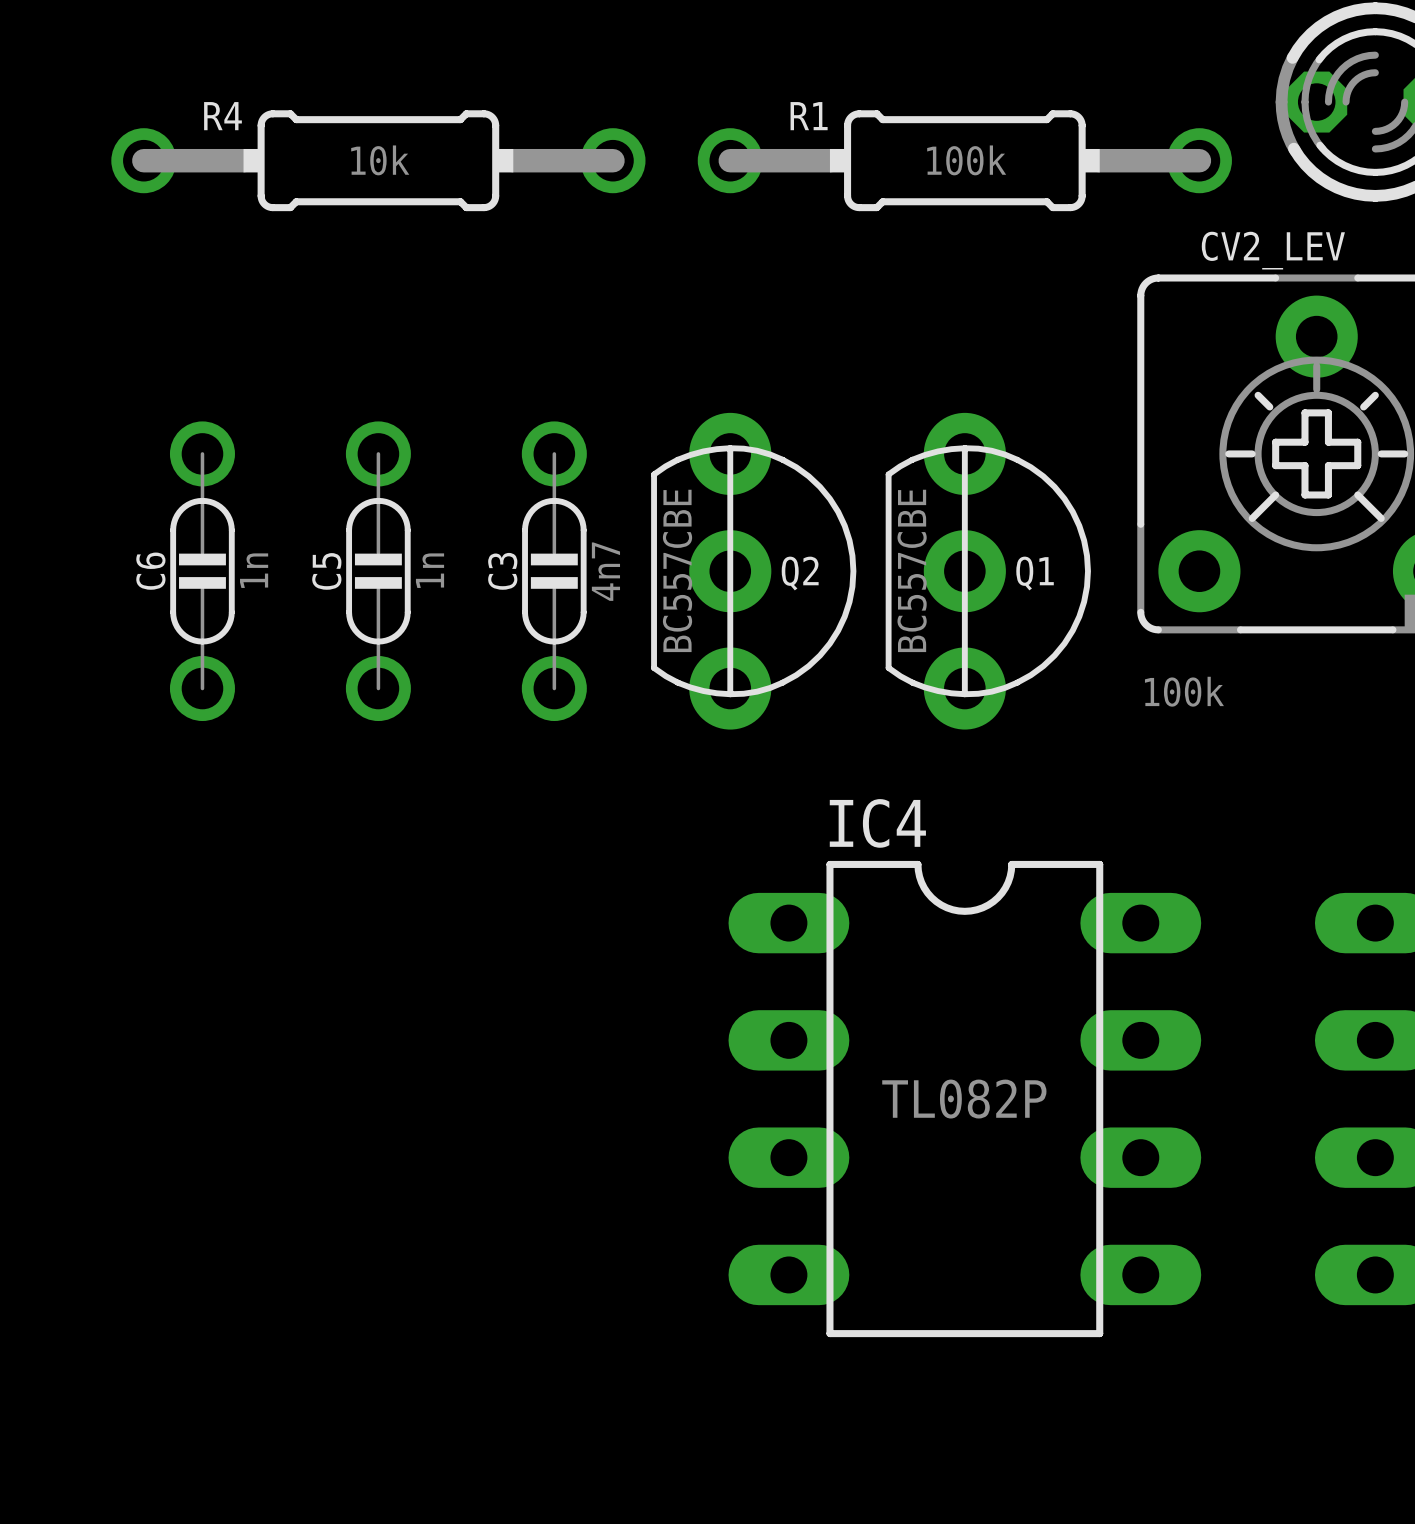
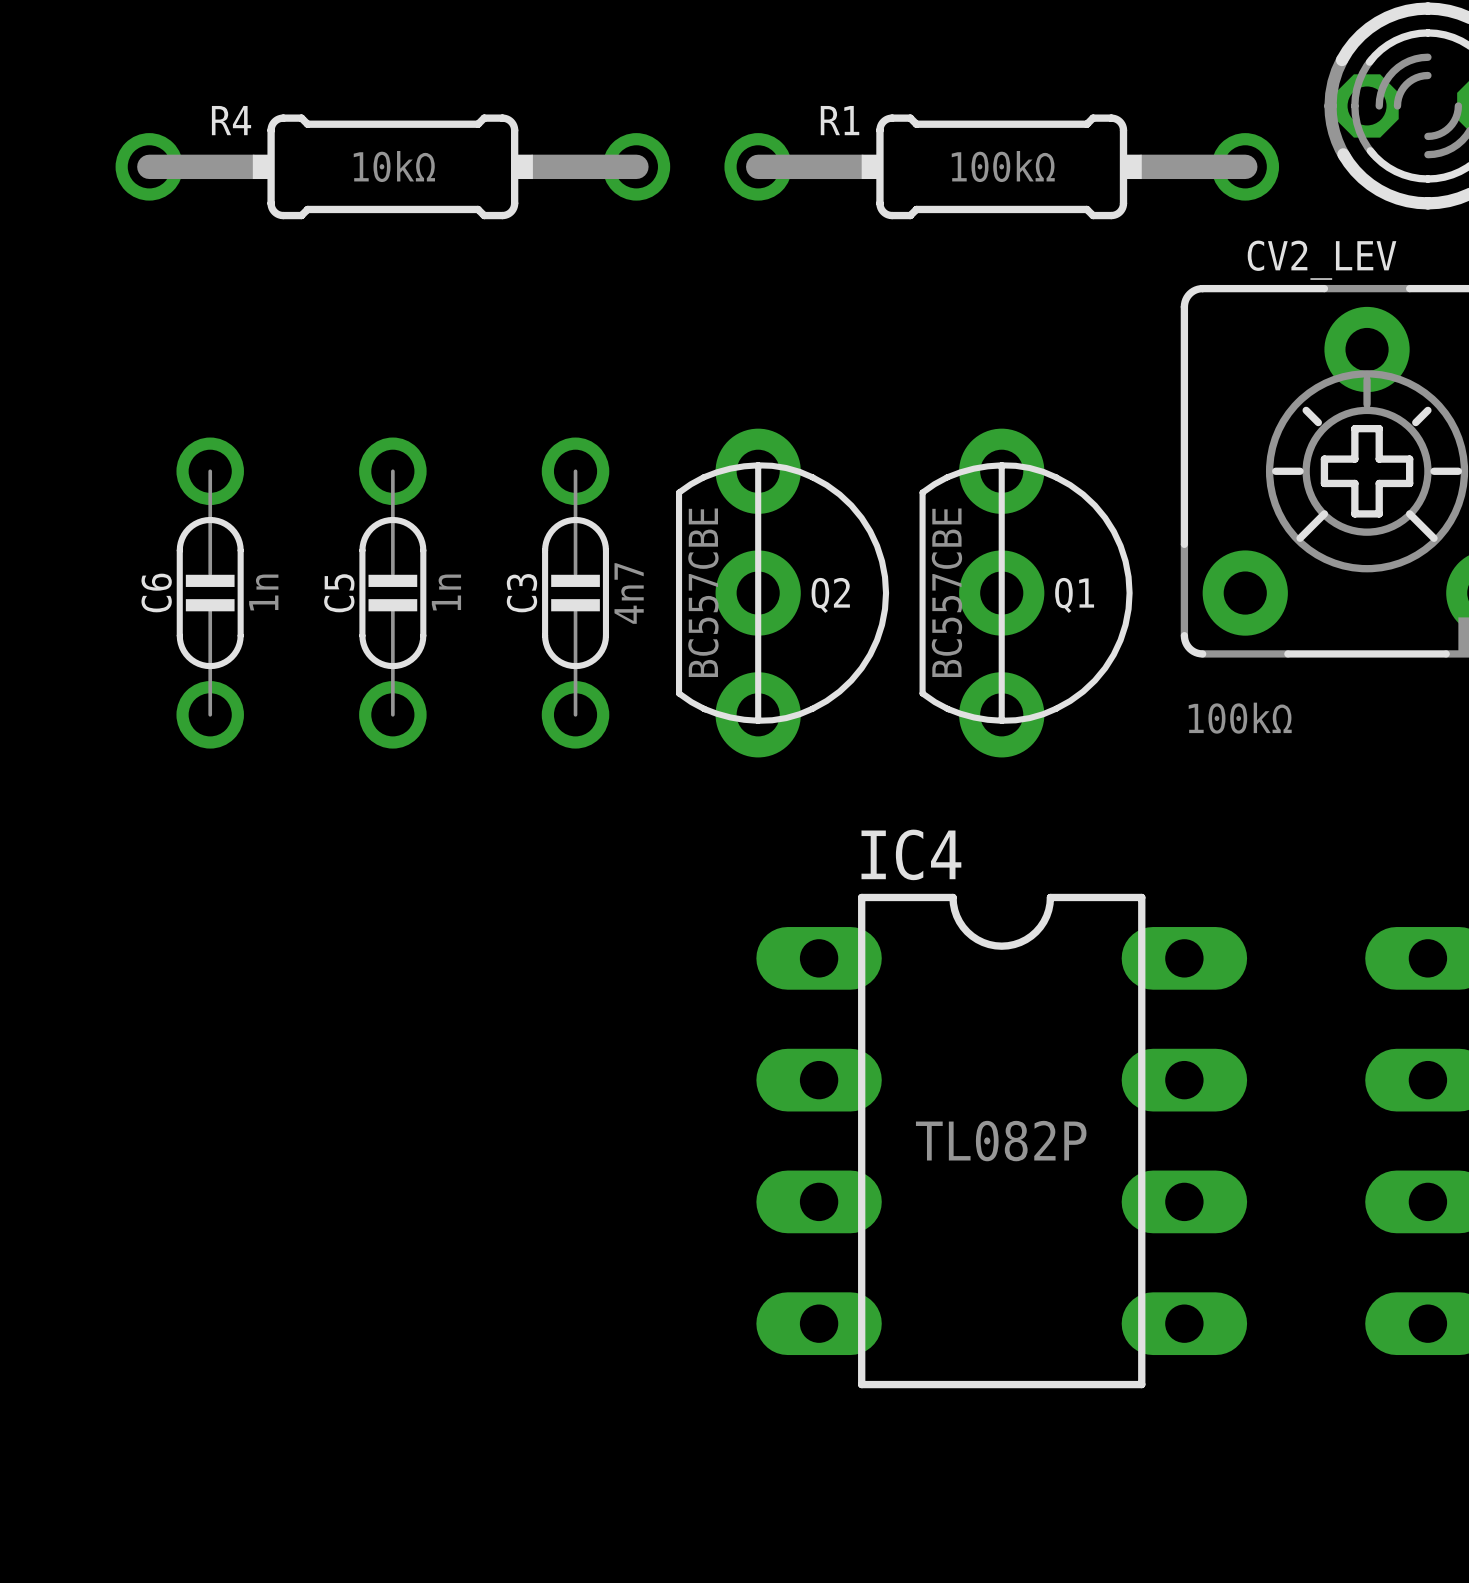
R4 value: 10k (380, 160) -> 10kΩ (394, 166)
R1 value: 100k (966, 160) -> 100kΩ (1003, 166)
CV2_LEV value: 100k (1184, 691) -> 100kΩ (1240, 718)

